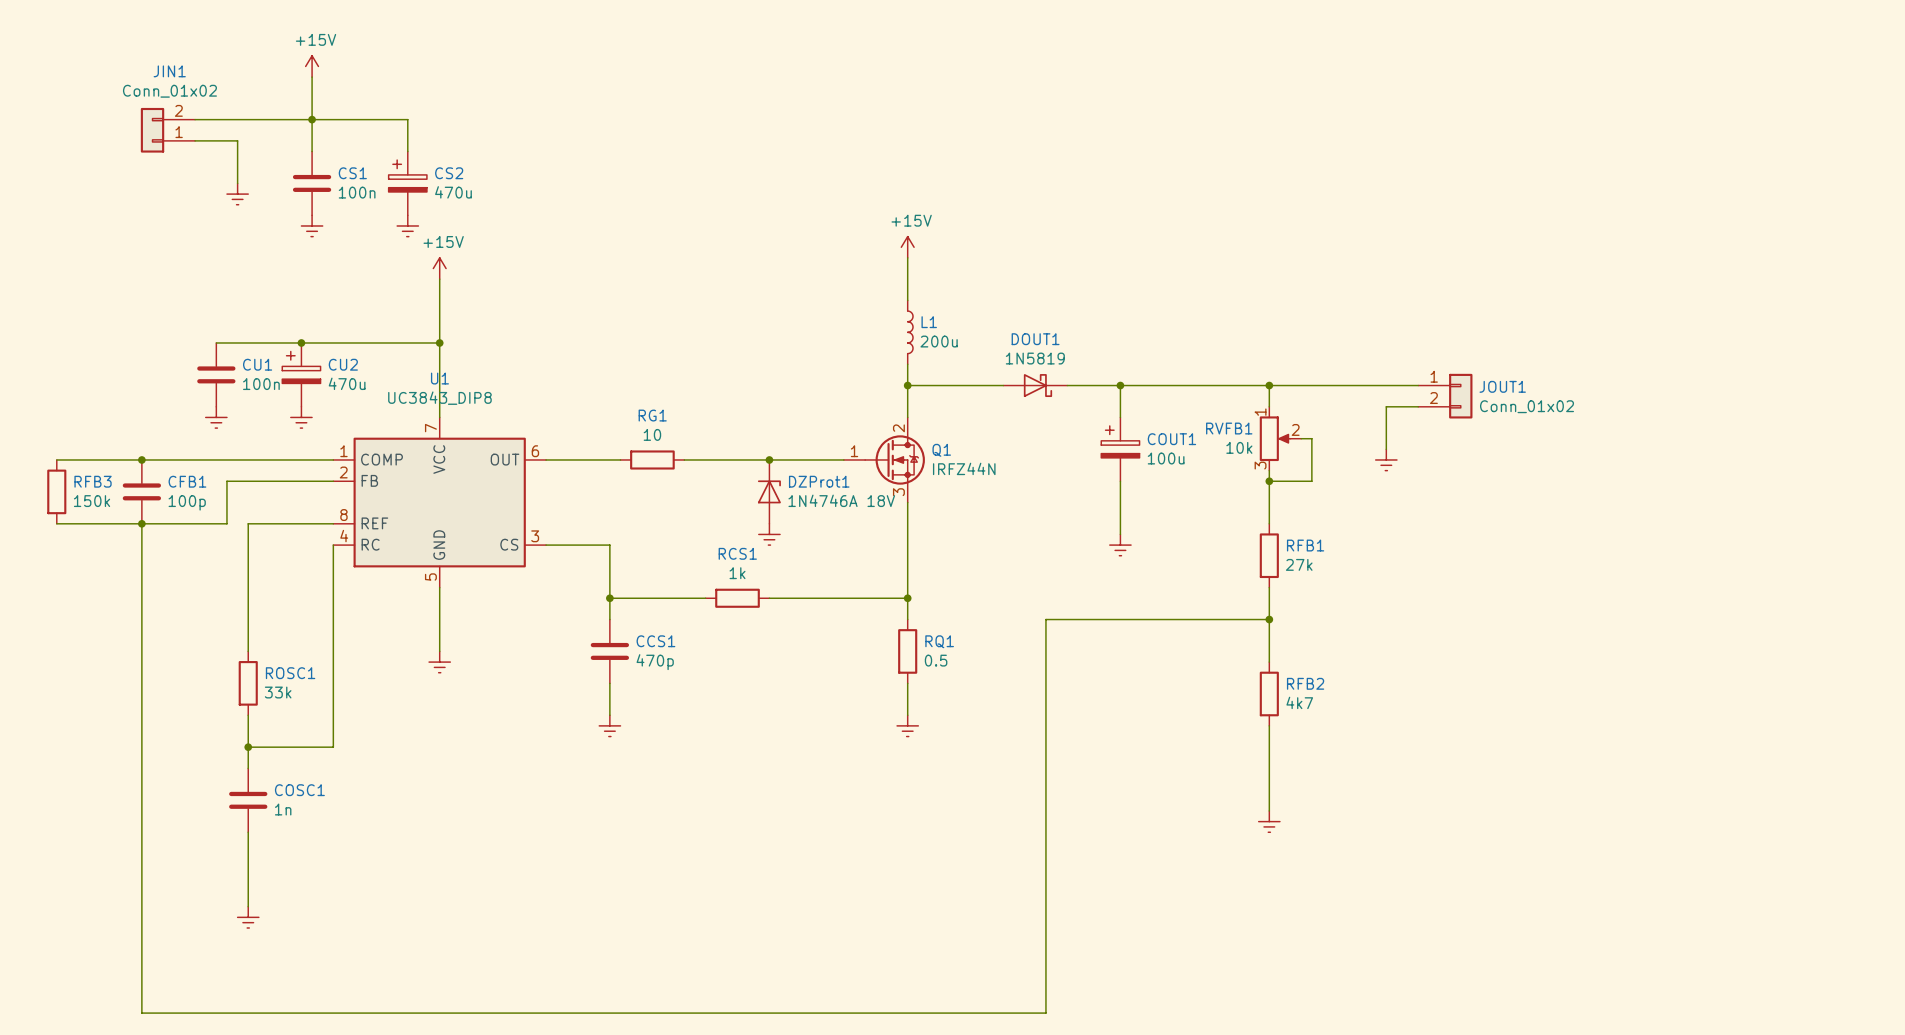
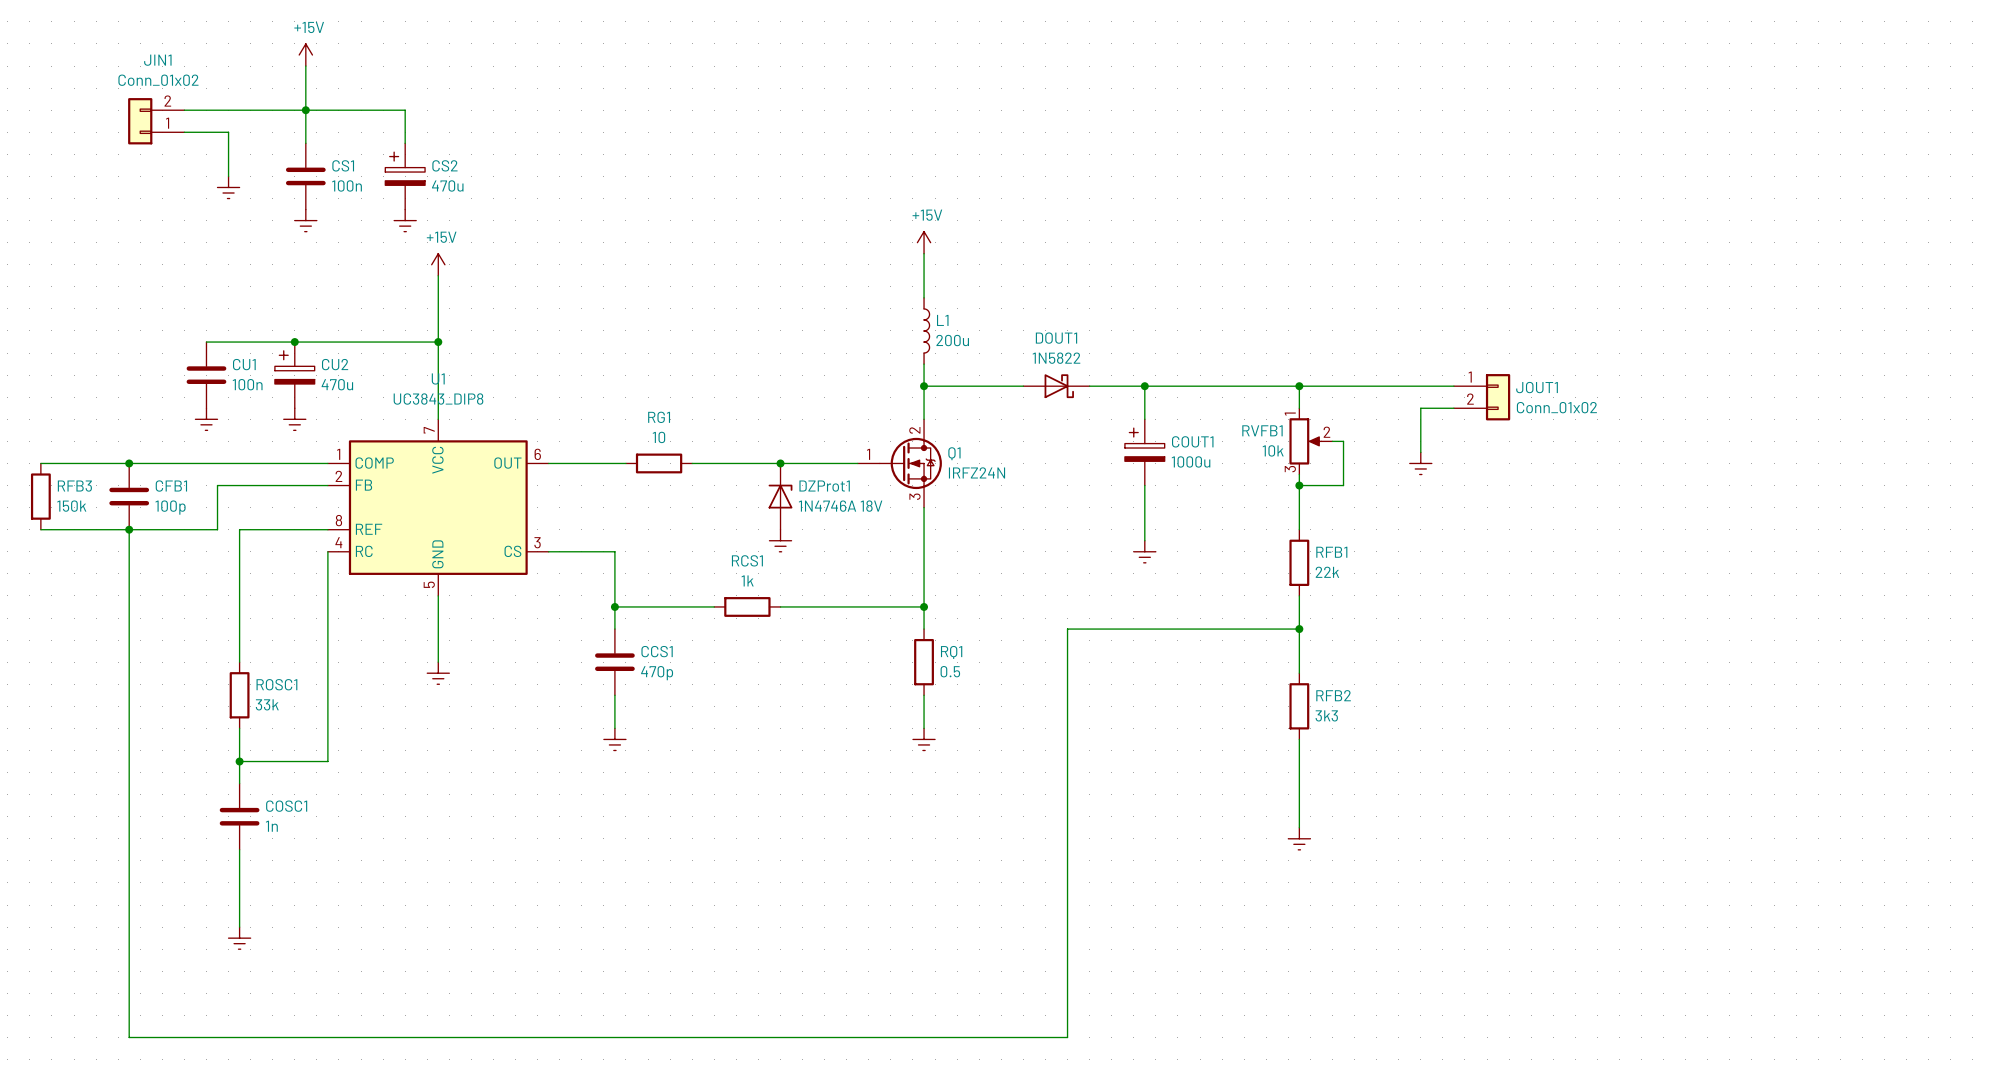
DOUT1 value: 1N5819 (1035, 358) -> 1N5822 (1056, 358)
COUT1 value: 100u (1166, 458) -> 1000u (1191, 461)
Q1 value: IRFZ44N (964, 468) -> IRFZ24N (977, 472)
RFB1 value: 27k (1299, 564) -> 22k (1327, 572)
RFB2 value: 4k7 (1299, 702) -> 3k3 (1326, 715)

